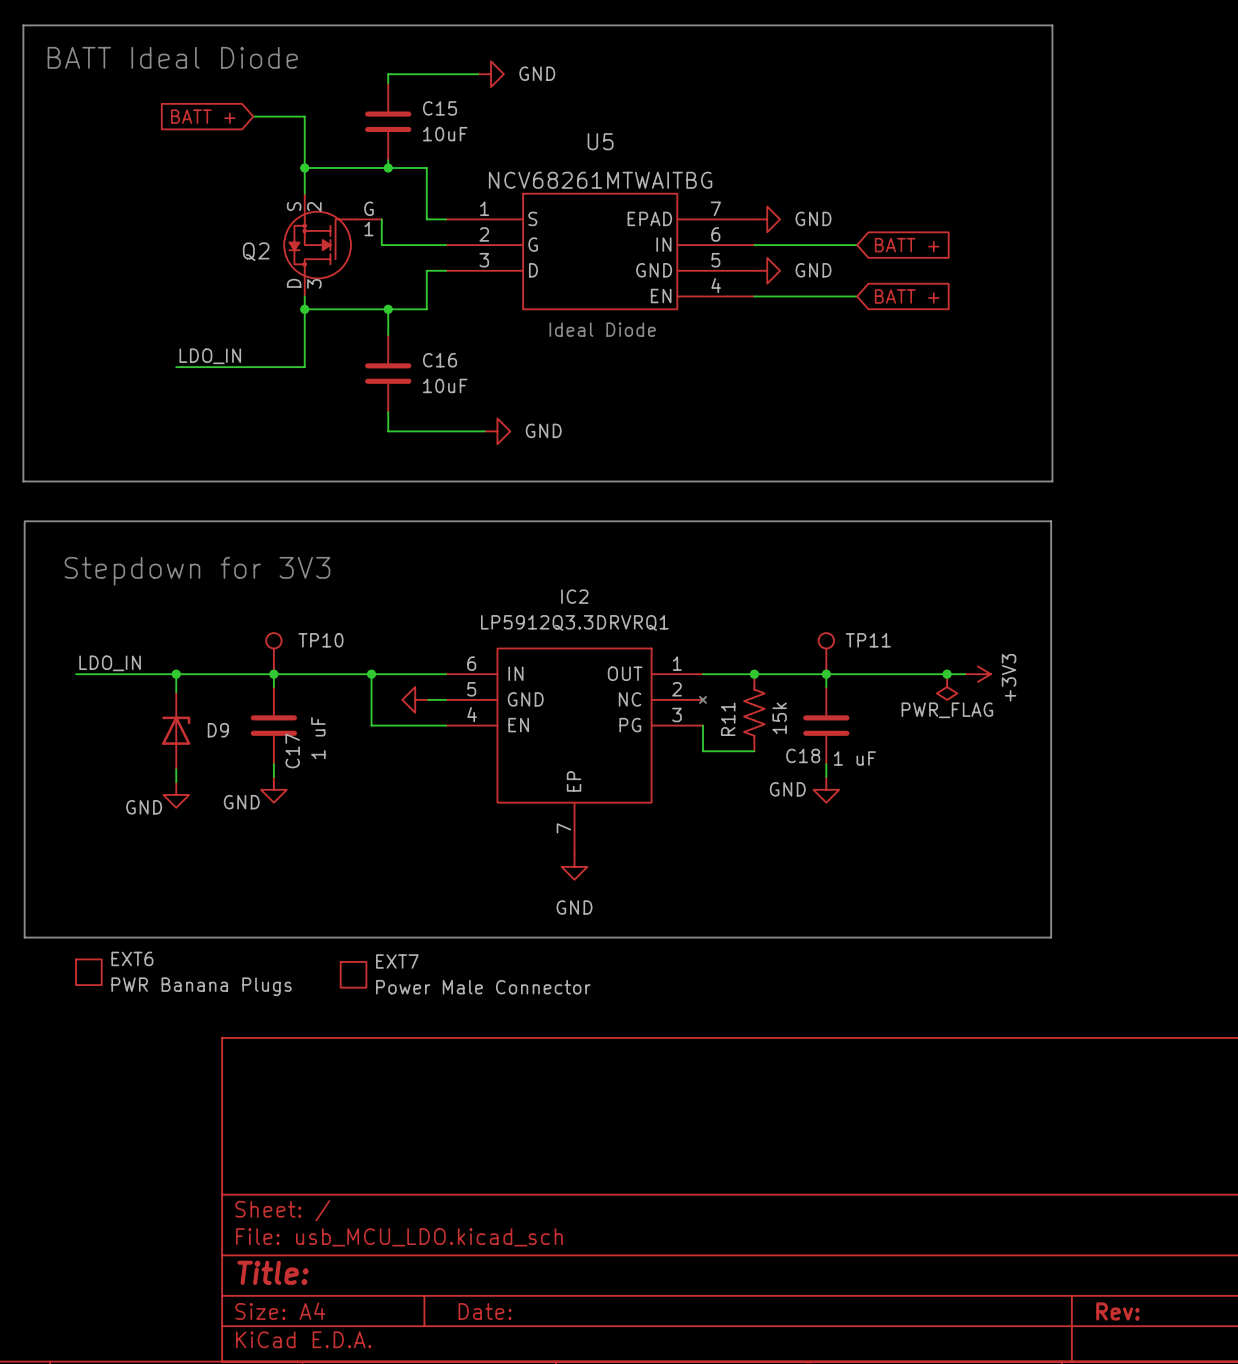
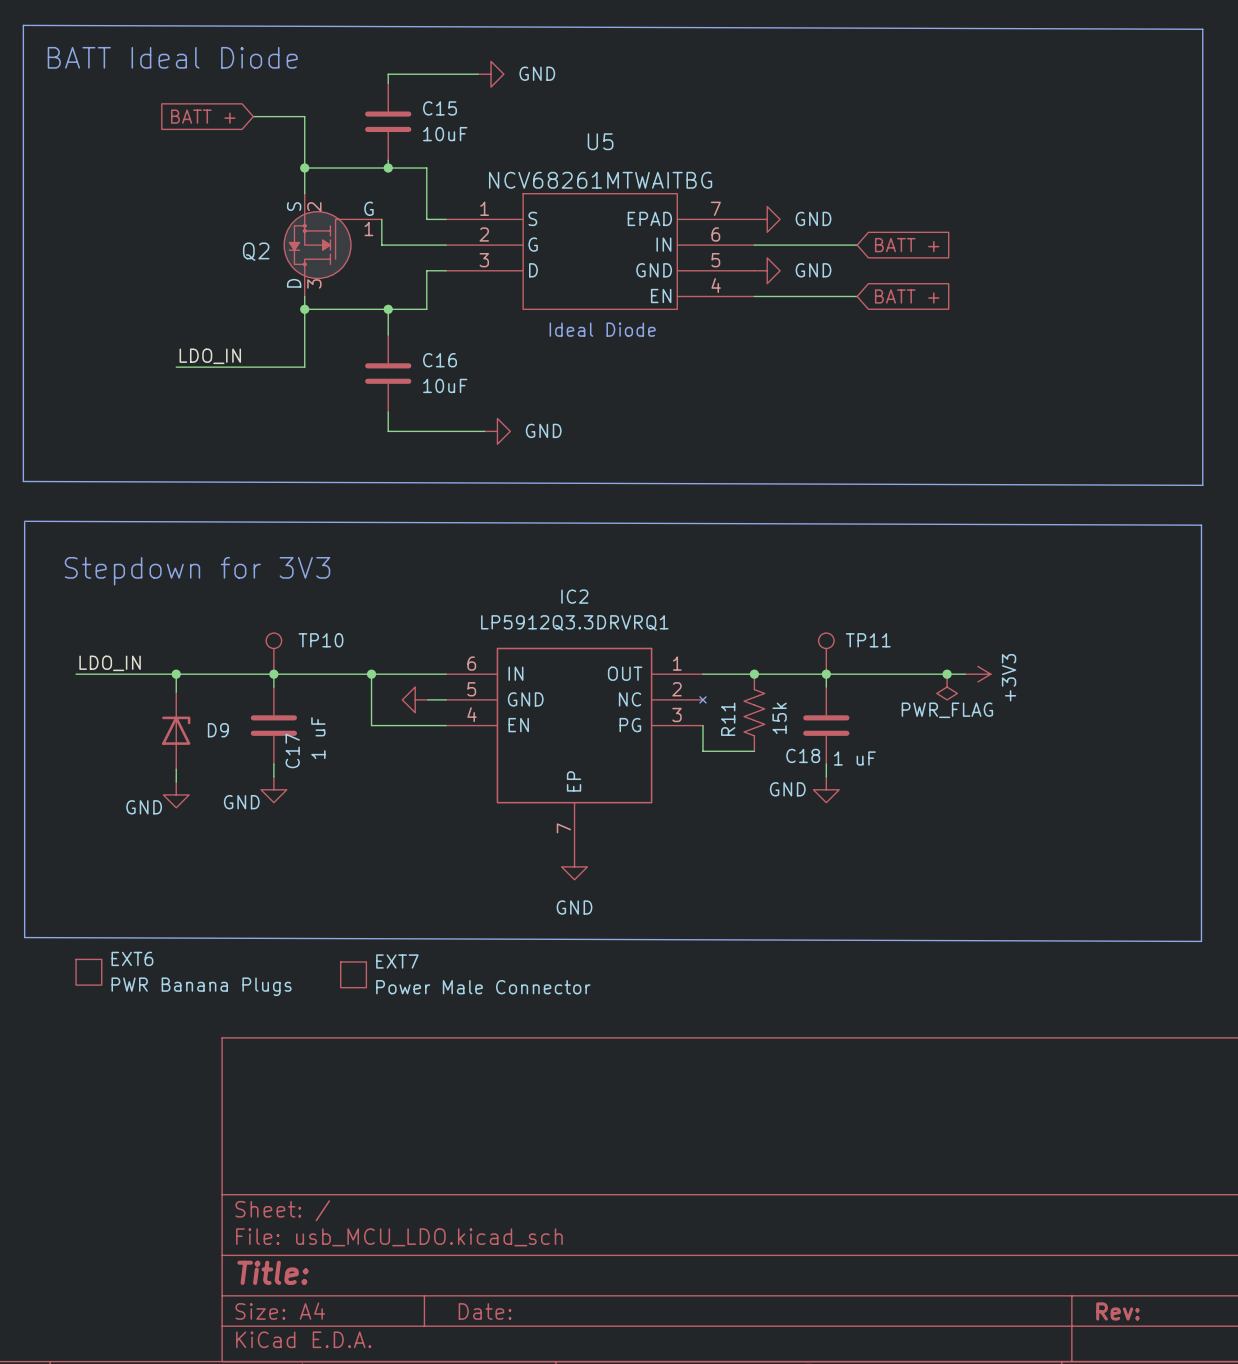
line: (23, 25) (1052, 25) (1052, 481) (23, 481) -> (23, 25) (1202, 29) (1202, 485) (23, 481)
line: (24, 521) (1051, 521) (1051, 937) (24, 937) -> (24, 521) (1201, 525) (1201, 941) (24, 937)

